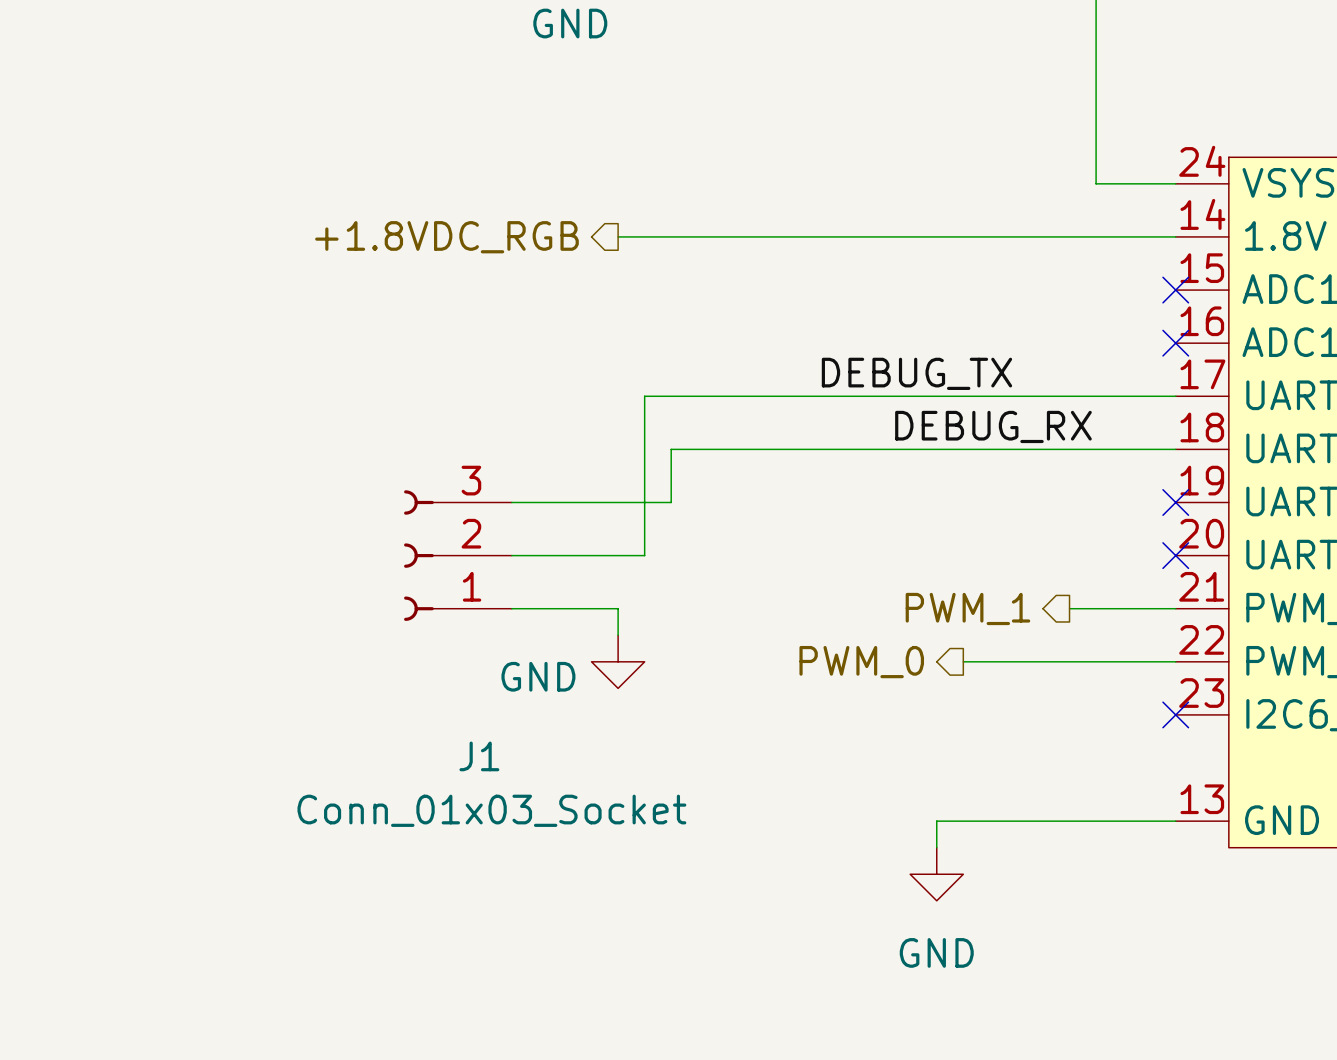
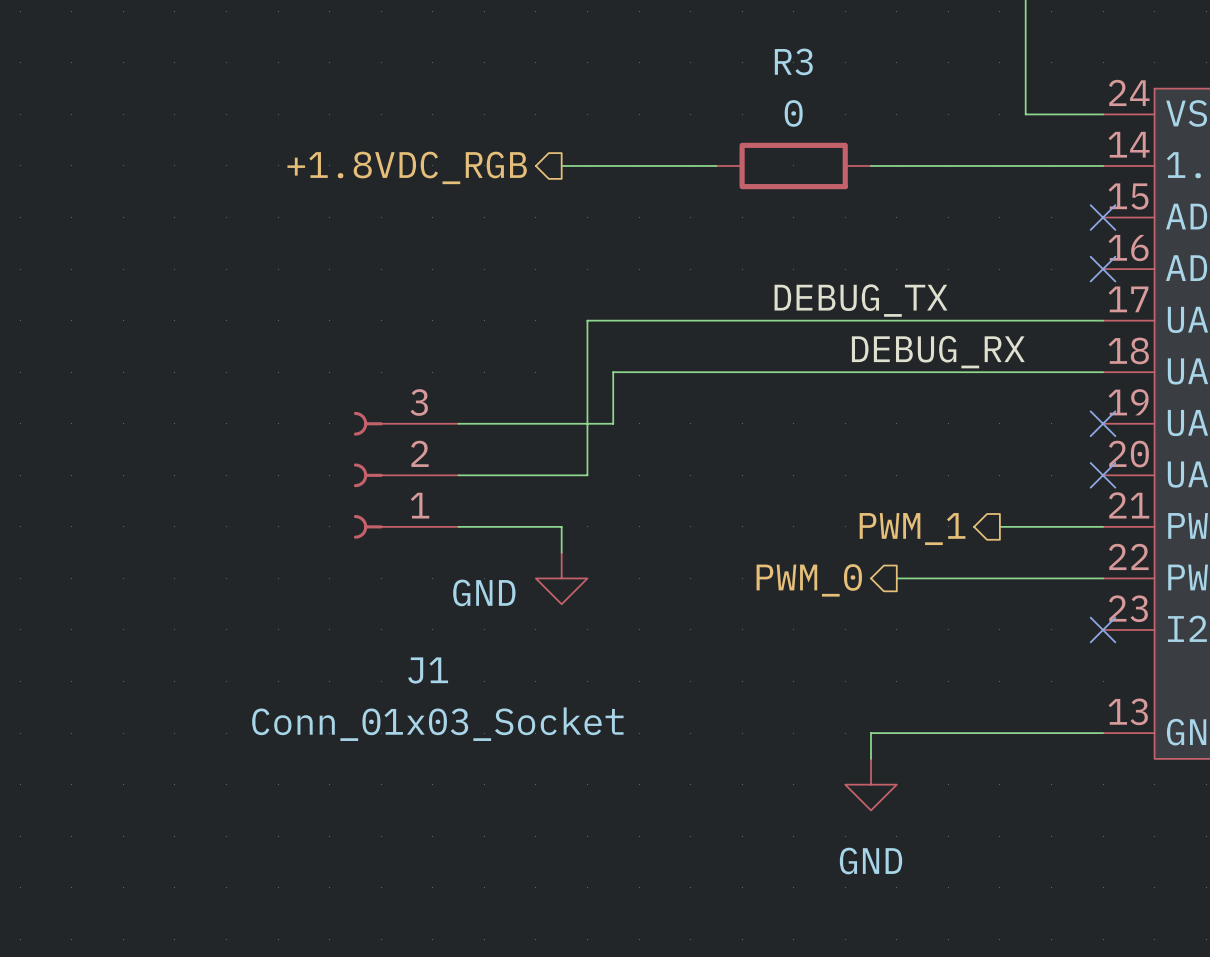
wire: (777, 236) (936, 236) -> none
R3: none -> 0 (793, 165)

